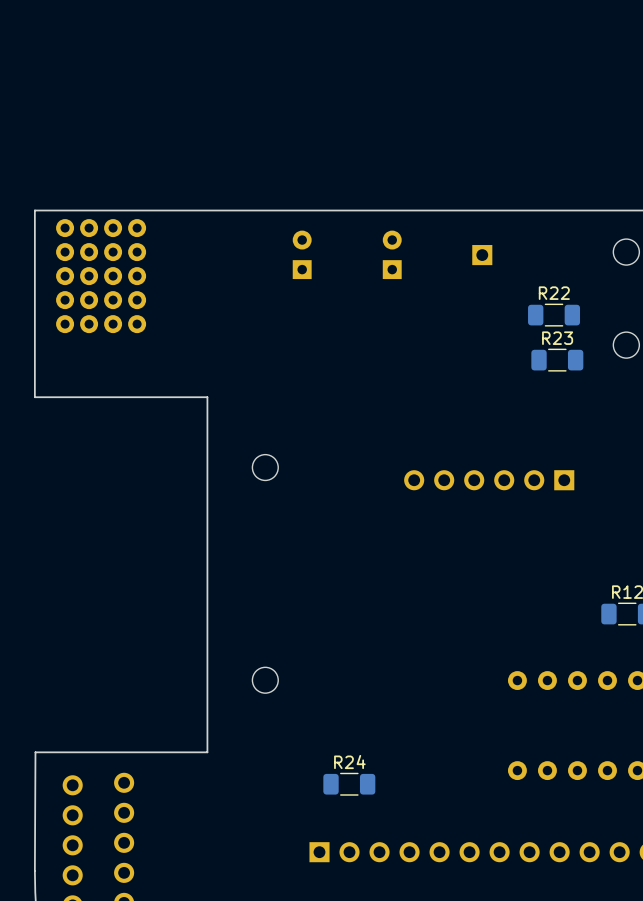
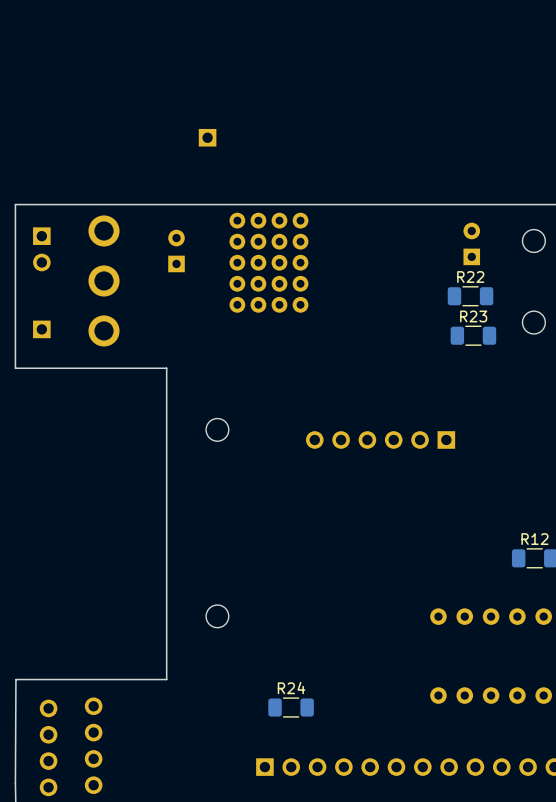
part: none -> (207, 137)
part position: (302, 254) -> (176, 251)
part: (392, 254) -> none
part: (482, 255) -> none
part: none -> (471, 243)
part: none -> (41, 249)
part position: (101, 276) -> (268, 262)
part: none -> (104, 280)
part: none -> (41, 329)
part position: (489, 480) -> (380, 439)

